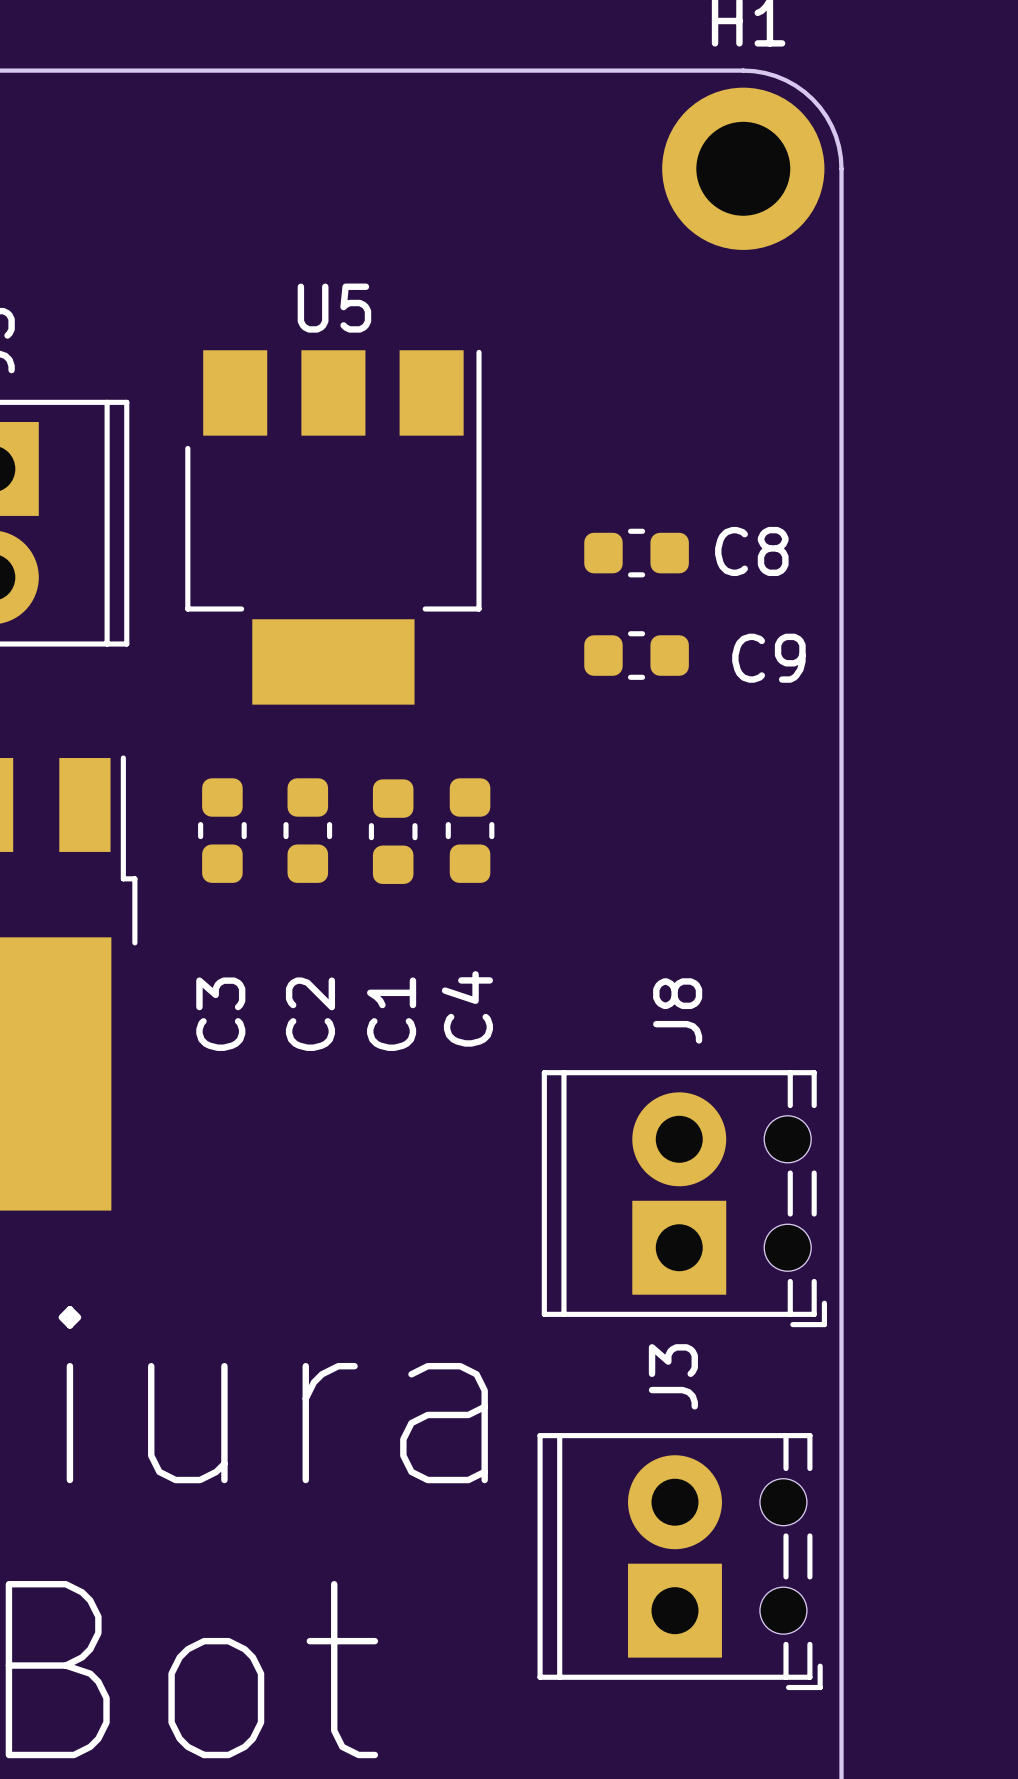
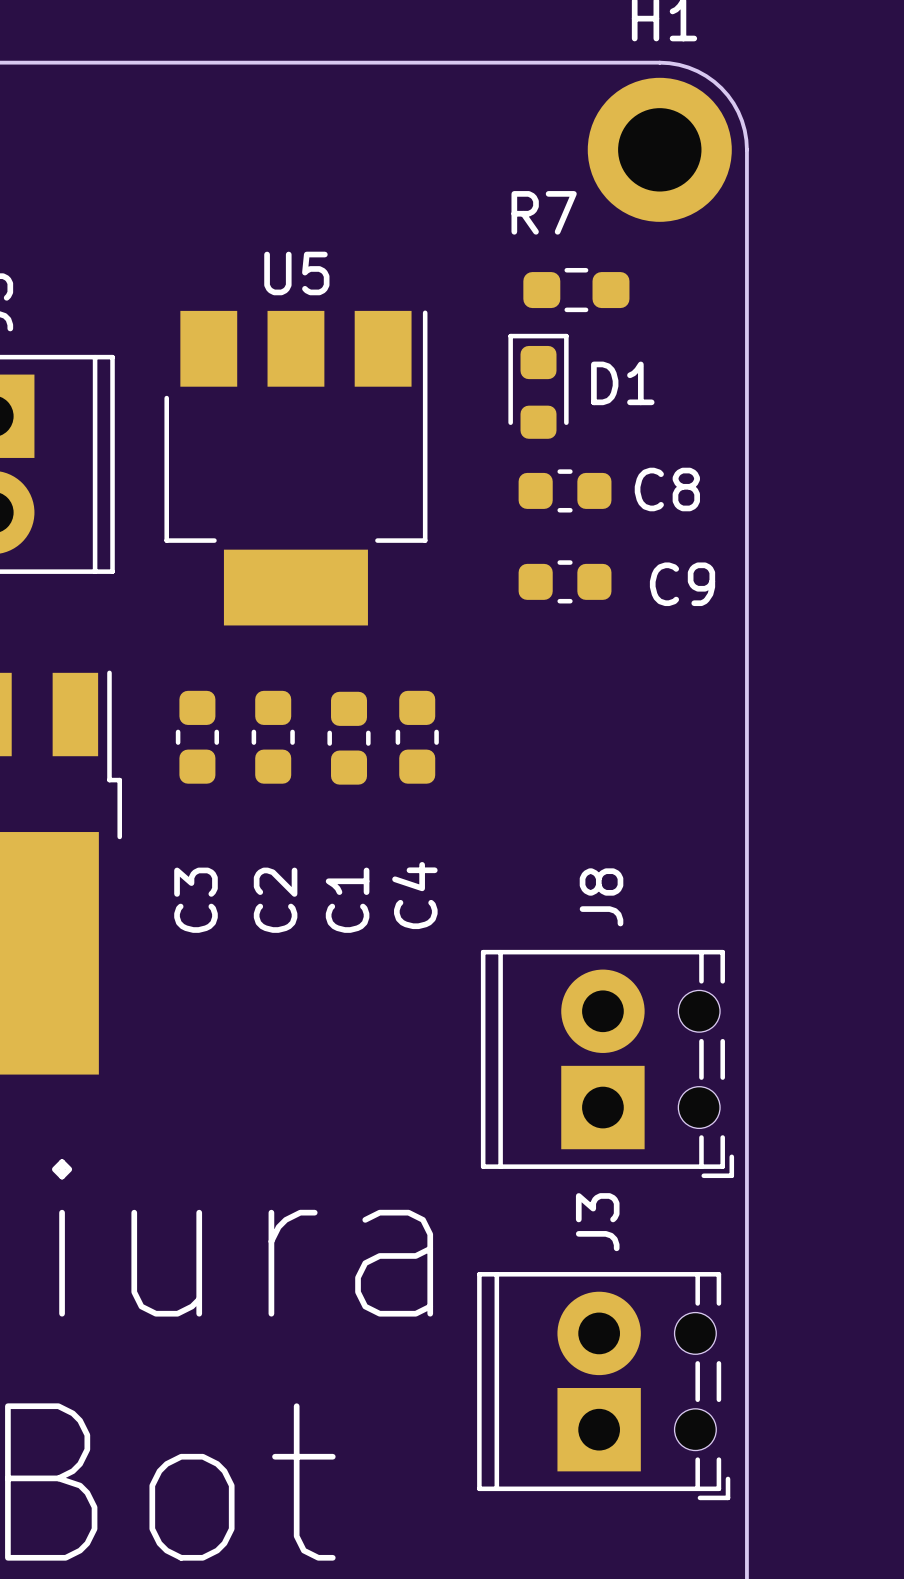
R7: none -> (576, 290)
D1: none -> (538, 386)

